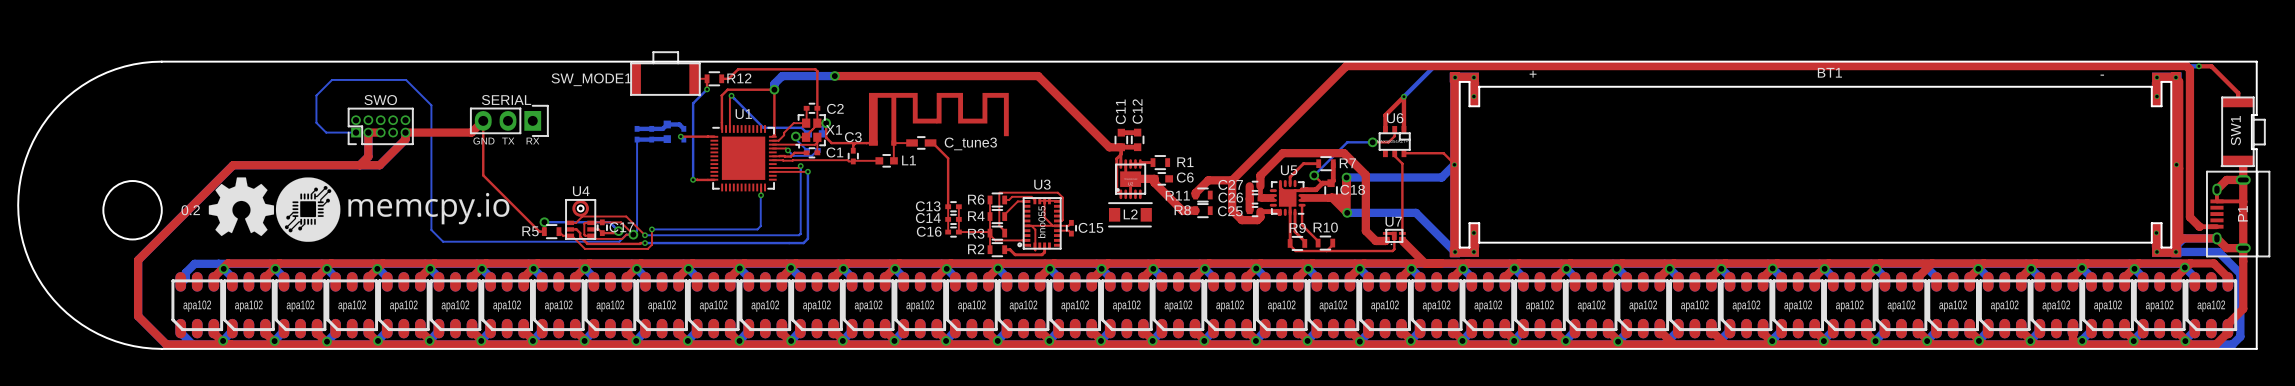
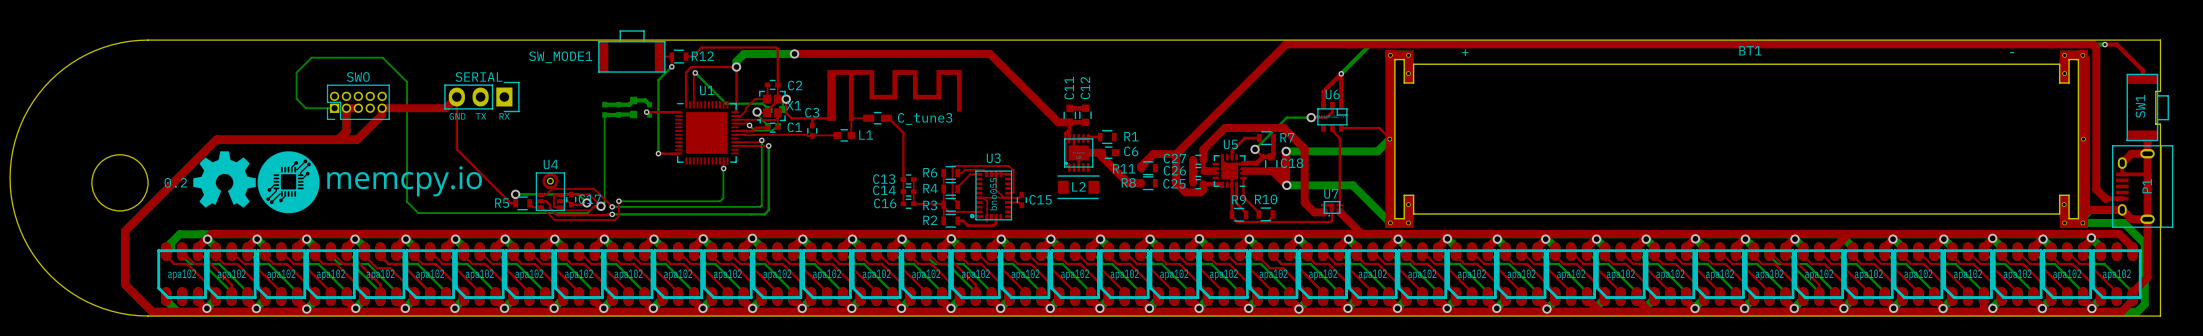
top track: none -> (166, 251) (166, 255) (174, 264) (187, 264) (215, 292) (215, 296)
top track: none -> (182, 251) (194, 264) (210, 264) (231, 284) (231, 296)
bottom track: none -> (182, 251) (182, 255) (190, 264) (203, 264) (231, 292) (231, 296)
bottom track: none -> (198, 251) (210, 264) (219, 264) (247, 292) (247, 296)
top track: none -> (215, 251) (215, 255) (223, 264) (237, 264) (265, 292) (265, 296)
top track: none -> (231, 251) (244, 264) (253, 264) (281, 292) (281, 296)
bottom track: none -> (247, 251) (260, 264) (268, 264) (297, 292) (297, 296)
top track: none -> (265, 251) (265, 255) (273, 264) (286, 264) (315, 292) (315, 296)
top track: none -> (281, 251) (293, 264) (302, 264) (330, 292) (330, 296)
bottom track: none -> (297, 251) (309, 264) (318, 264) (346, 292) (346, 296)
top track: none -> (315, 251) (315, 255) (323, 264) (336, 264) (364, 292) (364, 296)
top track: none -> (330, 251) (343, 264) (359, 264) (380, 284) (380, 296)
bottom track: none -> (330, 251) (330, 255) (339, 264) (352, 264) (380, 292) (380, 296)
bottom track: none -> (346, 251) (359, 264) (368, 264) (396, 292) (396, 296)
top track: none -> (364, 251) (364, 255) (377, 268) (390, 268) (414, 292) (414, 296)
top track: none -> (380, 251) (380, 255) (388, 264) (401, 264) (430, 292) (430, 296)
bottom track: none -> (396, 251) (408, 264) (417, 264) (446, 292) (446, 296)
top track: none -> (414, 251) (414, 255) (422, 264) (435, 264) (463, 292) (463, 296)
top track: none -> (430, 251) (442, 264) (451, 264) (479, 292) (479, 296)
bottom track: none -> (446, 251) (458, 264) (467, 264) (495, 292) (495, 296)
top track: none -> (463, 251) (463, 255) (472, 264) (485, 264) (513, 292) (513, 296)
top track: none -> (479, 251) (492, 264) (501, 264) (529, 292) (529, 296)
bottom track: none -> (495, 251) (508, 264) (516, 264) (545, 292) (545, 296)
top track: none -> (513, 251) (513, 255) (521, 264) (534, 264) (563, 292) (563, 296)
top track: none -> (529, 251) (541, 264) (550, 264) (578, 292) (578, 296)
bottom track: none -> (545, 251) (557, 264) (566, 264) (594, 292) (594, 296)
top track: none -> (563, 251) (563, 255) (571, 264) (584, 264) (612, 292) (612, 296)
top track: none -> (578, 251) (591, 264) (600, 264) (628, 292) (628, 296)
bottom track: none -> (594, 251) (607, 264) (616, 264) (644, 292) (644, 296)
top track: none -> (612, 251) (612, 255) (620, 264) (633, 264) (662, 292) (662, 296)
top track: none -> (628, 251) (640, 264) (649, 264) (678, 292) (678, 296)
bottom track: none -> (644, 251) (656, 264) (665, 264) (694, 292) (694, 296)
top track: none -> (662, 251) (662, 255) (670, 264) (683, 264) (711, 292) (711, 296)
top track: none -> (678, 251) (690, 264) (699, 264) (727, 292) (727, 296)
bottom track: none -> (694, 251) (706, 264) (715, 264) (743, 292) (743, 296)
top track: none -> (711, 251) (711, 255) (720, 264) (733, 264) (761, 292) (761, 296)
top track: none -> (727, 251) (740, 264) (749, 264) (777, 292) (777, 296)
bottom track: none -> (743, 251) (756, 264) (765, 264) (793, 292) (793, 296)
top track: none -> (761, 251) (761, 255) (769, 264) (782, 264) (811, 292) (811, 296)
top track: none -> (777, 251) (789, 264) (798, 264) (827, 292) (827, 296)
bottom track: none -> (793, 251) (805, 264) (814, 264) (842, 292) (842, 296)
top track: none -> (811, 251) (811, 255) (819, 264) (832, 264) (860, 292) (860, 296)
top track: none -> (827, 251) (839, 264) (848, 264) (876, 292) (876, 296)
bottom track: none -> (842, 251) (855, 264) (864, 264) (892, 292) (892, 296)
top track: none -> (860, 251) (860, 255) (868, 264) (882, 264) (910, 292) (910, 296)
top track: none -> (876, 251) (889, 264) (897, 264) (926, 292) (926, 296)
bottom track: none -> (892, 251) (904, 264) (913, 264) (942, 292) (942, 296)
top track: none -> (910, 251) (910, 255) (918, 264) (931, 264) (959, 292) (959, 296)
top track: none -> (926, 251) (938, 264) (955, 264) (975, 284) (975, 296)
bottom track: none -> (926, 251) (926, 255) (934, 264) (947, 264) (975, 292) (975, 296)
bottom track: none -> (942, 251) (954, 264) (963, 264) (991, 292) (991, 296)
top track: none -> (959, 251) (959, 255) (968, 264) (981, 264) (1009, 292) (1009, 296)
top track: none -> (975, 251) (988, 264) (997, 264) (1025, 292) (1025, 296)
bottom track: none -> (991, 251) (1004, 264) (1013, 264) (1041, 292) (1041, 296)
top track: none -> (1009, 251) (1009, 255) (1017, 264) (1030, 264) (1059, 292) (1059, 296)
top track: none -> (1025, 251) (1037, 264) (1046, 264) (1075, 292) (1075, 296)
bottom track: none -> (1041, 251) (1053, 264) (1062, 264) (1090, 292) (1090, 296)
top track: none -> (1059, 251) (1059, 255) (1067, 264) (1080, 264) (1108, 292) (1108, 296)
top track: none -> (1075, 251) (1087, 264) (1096, 264) (1124, 292) (1124, 296)
bottom track: none -> (1090, 251) (1103, 264) (1112, 264) (1140, 292) (1140, 296)
top track: none -> (1108, 251) (1108, 255) (1116, 264) (1130, 264) (1158, 292) (1158, 296)
top track: none -> (1124, 251) (1137, 264) (1145, 264) (1174, 292) (1174, 296)
bottom track: none -> (1140, 251) (1152, 264) (1161, 264) (1190, 292) (1190, 296)
top track: none -> (1158, 251) (1158, 255) (1166, 264) (1179, 264) (1207, 292) (1207, 296)
top track: none -> (1174, 251) (1186, 264) (1195, 264) (1223, 292) (1223, 296)
bottom track: none -> (1190, 251) (1202, 264) (1211, 264) (1239, 292) (1239, 296)
top track: none -> (1207, 251) (1207, 255) (1216, 264) (1229, 264) (1257, 292) (1257, 296)
top track: none -> (1223, 251) (1236, 264) (1245, 264) (1273, 292) (1273, 296)
bottom track: none -> (1239, 251) (1252, 264) (1261, 264) (1289, 292) (1289, 296)
top track: none -> (1257, 251) (1257, 255) (1270, 268) (1283, 268) (1307, 292) (1307, 296)
top track: none -> (1273, 251) (1273, 255) (1281, 264) (1294, 264) (1323, 292) (1323, 296)
bottom track: none -> (1289, 251) (1301, 264) (1310, 264) (1339, 292) (1339, 296)
top track: none -> (1307, 251) (1307, 255) (1315, 264) (1328, 264) (1356, 292) (1356, 296)
top track: none -> (1323, 251) (1335, 264) (1344, 264) (1372, 292) (1372, 296)
bottom track: none -> (1339, 251) (1351, 264) (1360, 264) (1388, 292) (1388, 296)
top track: none -> (1356, 251) (1356, 255) (1365, 264) (1378, 264) (1406, 292) (1406, 296)
top track: none -> (1372, 251) (1385, 264) (1394, 264) (1422, 292) (1422, 296)
bottom track: none -> (1388, 251) (1401, 264) (1409, 264) (1438, 292) (1438, 296)
top track: none -> (1406, 251) (1406, 255) (1414, 264) (1427, 264) (1456, 292) (1456, 296)
top track: none -> (1422, 251) (1434, 264) (1443, 264) (1471, 292) (1471, 296)
bottom track: none -> (1438, 251) (1450, 264) (1459, 264) (1487, 292) (1487, 296)
top track: none -> (1456, 251) (1456, 255) (1464, 264) (1477, 264) (1505, 292) (1505, 296)
top track: none -> (1471, 251) (1484, 264) (1493, 264) (1521, 292) (1521, 296)
bottom track: none -> (1487, 251) (1500, 264) (1509, 264) (1537, 292) (1537, 296)
top track: none -> (1505, 251) (1505, 255) (1513, 264) (1526, 264) (1555, 292) (1555, 296)
top track: none -> (1521, 251) (1533, 264) (1542, 264) (1571, 292) (1571, 296)
bottom track: none -> (1537, 251) (1549, 264) (1558, 264) (1587, 292) (1587, 296)
top track: none -> (1555, 251) (1555, 255) (1563, 264) (1576, 264) (1604, 292) (1604, 296)
top track: none -> (1571, 251) (1583, 264) (1592, 264) (1620, 292) (1620, 296)
bottom track: none -> (1587, 251) (1599, 264) (1608, 264) (1636, 292) (1636, 296)
top track: none -> (1604, 251) (1604, 255) (1613, 264) (1626, 264) (1654, 292) (1654, 296)
top track: none -> (1620, 251) (1633, 264) (1642, 264) (1670, 292) (1670, 296)
bottom track: none -> (1636, 251) (1649, 264) (1657, 264) (1686, 292) (1686, 296)
top track: none -> (1654, 251) (1654, 255) (1662, 264) (1675, 264) (1704, 292) (1704, 296)
top track: none -> (1670, 251) (1682, 264) (1691, 264) (1719, 292) (1719, 296)
bottom track: none -> (1686, 251) (1698, 264) (1707, 264) (1735, 292) (1735, 296)
top track: none -> (1704, 251) (1704, 255) (1712, 264) (1725, 264) (1753, 292) (1753, 296)
top track: none -> (1719, 251) (1732, 264) (1741, 264) (1769, 292) (1769, 296)
bottom track: none -> (1735, 251) (1748, 264) (1757, 264) (1785, 292) (1785, 296)
top track: none -> (1753, 251) (1753, 255) (1761, 264) (1774, 264) (1803, 292) (1803, 296)
top track: none -> (1769, 251) (1782, 264) (1798, 264) (1819, 284) (1819, 296)
bottom track: none -> (1769, 251) (1769, 255) (1777, 264) (1790, 264) (1819, 292) (1819, 296)
bottom track: none -> (1785, 251) (1797, 264) (1806, 264) (1835, 292) (1835, 296)
top track: none -> (1803, 251) (1803, 255) (1811, 264) (1824, 264) (1852, 292) (1852, 296)
top track: none -> (1819, 251) (1831, 264) (1840, 264) (1868, 292) (1868, 296)
bottom track: none -> (1835, 251) (1847, 264) (1856, 264) (1884, 292) (1884, 296)
top track: none -> (1852, 251) (1852, 255) (1861, 264) (1874, 264) (1902, 292) (1902, 296)
top track: none -> (1868, 251) (1881, 264) (1890, 264) (1918, 292) (1918, 296)
bottom track: none -> (1884, 251) (1897, 264) (1906, 264) (1934, 292) (1934, 296)
top track: none -> (1902, 251) (1902, 255) (1910, 264) (1923, 264) (1952, 292) (1952, 296)
top track: none -> (1918, 251) (1930, 264) (1939, 264) (1968, 292) (1968, 296)
bottom track: none -> (1934, 251) (1946, 264) (1955, 264) (1983, 292) (1983, 296)
top track: none -> (1952, 251) (1952, 255) (1960, 264) (1973, 264) (2001, 292) (2001, 296)
top track: none -> (1968, 251) (1980, 264) (1989, 264) (2017, 292) (2017, 296)
bottom track: none -> (1983, 251) (1996, 264) (2005, 264) (2033, 292) (2033, 296)
top track: none -> (2001, 251) (2001, 255) (2009, 264) (2023, 264) (2051, 292) (2051, 296)
top track: none -> (2017, 251) (2030, 264) (2038, 264) (2067, 292) (2067, 296)
bottom track: none -> (2033, 251) (2045, 264) (2054, 264) (2083, 292) (2083, 296)
top track: none -> (2051, 251) (2051, 255) (2059, 264) (2072, 264) (2100, 292) (2100, 296)
top track: none -> (2067, 251) (2079, 264) (2088, 264) (2116, 292) (2116, 296)
bottom track: none -> (2083, 251) (2095, 264) (2104, 264) (2132, 292) (2132, 296)

